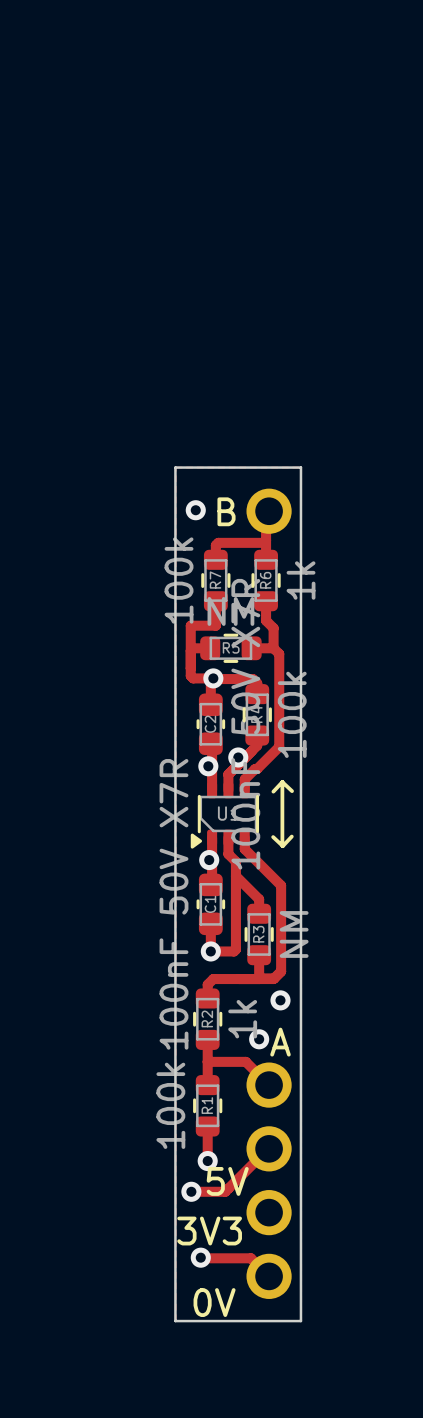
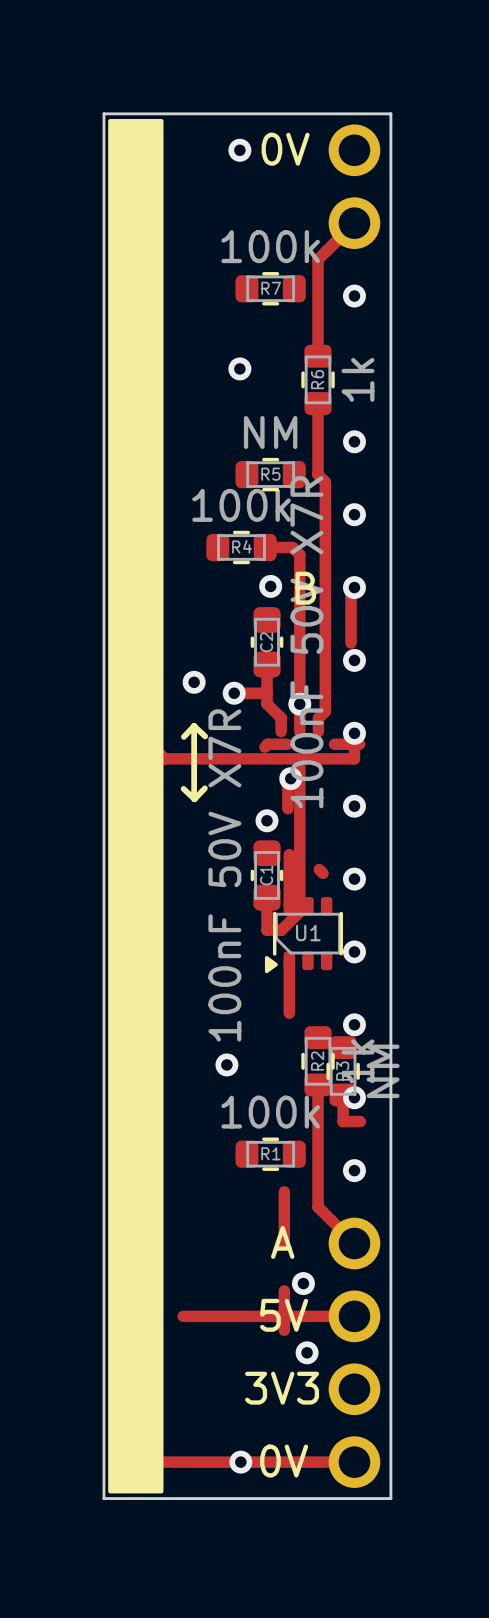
drawing: none -> [108, 118, 164, 1494]
text: none -> 0V (285, 149)
via: none -> (239, 150)
part: none -> (354, 150)
track: none -> (354, 223) (318, 259) (318, 343)
part: none -> (354, 223)
via: none -> (354, 296)
via: none -> (239, 368)
track: none -> (318, 403) (318, 474) (325, 481) (325, 711) (318, 718) (318, 731)
via: none -> (354, 441)
via: none -> (354, 514)
board edge: (300, 467) (175, 467) (175, 1321) (300, 1321) (300, 1308) -> (390, 537) (390, 113) (103, 113) (103, 1498) (390, 1498)
track: none -> (265, 547) (292, 547) (299, 554) (299, 731)
part: (269, 511) -> none
via: none -> (354, 587)
track: (266, 540) (263, 542) (218, 542) (215, 545) (215, 559) -> none
via: none -> (354, 660)
track: none -> (267, 664) (267, 703) (281, 718) (281, 731)
R7 rotation: 0° (215, 580) -> 90° clockwise (270, 288)
R7 position: (215, 580) -> (270, 288)
R6 position: (266, 580) -> (318, 379)
via: none -> (194, 682)
track: (215, 601) (215, 625) (190, 625) (190, 675) (193, 678) (252, 679) (257, 683) (257, 694) -> none
track: (266, 601) (266, 620) (273, 628) (273, 648) (279, 653) (279, 746) (244, 779) (244, 790) -> none
track: none -> (234, 693) (267, 693)
via: none -> (234, 693)
via: none -> (299, 704)
track: none -> (139, 733) (164, 758) (354, 758) (354, 733)
via: none -> (354, 733)
line: none -> (205, 736) (194, 726) (194, 798)
R5 position: (230, 648) -> (270, 474)
track: none -> (299, 758) (299, 911) (281, 930) (267, 930) (267, 897)
line: none -> (204, 788) (194, 799) (183, 788)
via: none -> (354, 806)
R4 rotation: 0° (257, 714) -> 90° clockwise (241, 547)
R4 position: (257, 714) -> (241, 547)
R4 value position: 100k (292, 714) -> 100k (241, 505)
via: none -> (267, 820)
C2 position: (210, 724) -> (267, 642)
track: (257, 735) (257, 745) (228, 774) (228, 790) -> none
via: (238, 757) -> none
via: (208, 766) -> none
via: none -> (354, 879)
line: (282, 781) (273, 791) -> (194, 725) (183, 736)
line: (282, 782) (282, 845) -> none
line: (282, 782) (292, 791) -> none
via: none -> (354, 951)
line: (291, 836) (282, 846) -> none
track: (228, 837) (228, 854) (235, 861) (235, 949) (234, 951) (210, 951) (210, 923) -> none
track: (244, 837) (244, 849) (281, 885) (281, 971) (273, 979) (213, 979) (207, 984) (207, 998) -> none
line: (273, 837) (282, 846) -> none
via: (209, 860) -> none
track: (235, 876) (259, 899) (259, 913) -> none
via: none -> (354, 1024)
C1 position: (210, 904) -> (267, 875)
via: none -> (226, 1064)
via: (210, 951) -> none
via: none -> (354, 1097)
via: (280, 1000) -> none
R2 position: (207, 1019) -> (318, 1061)
via position: (259, 1039) -> (354, 1170)
text position: A (280, 1042) -> A (282, 1242)
track: (207, 1061) (245, 1061) -> (318, 1084) (318, 1207) (327, 1216)
R1 rotation: 0° (207, 1105) -> 90° clockwise (270, 1154)
R1 position: (207, 1105) -> (270, 1154)
via: none -> (303, 1283)
track: (268, 1148) (225, 1191) (191, 1191) -> (354, 1316) (183, 1316)
via: (207, 1161) -> none
via: none -> (307, 1352)
text position: 5V (227, 1181) -> 5V (284, 1315)
via: (191, 1191) -> none
text position: 3V3 (209, 1231) -> 3V3 (282, 1388)
track: (200, 1257) (251, 1258) (269, 1276) -> (139, 1462) (354, 1462)
via position: (200, 1257) -> (240, 1462)
text position: 0V (214, 1302) -> 0V (284, 1461)

